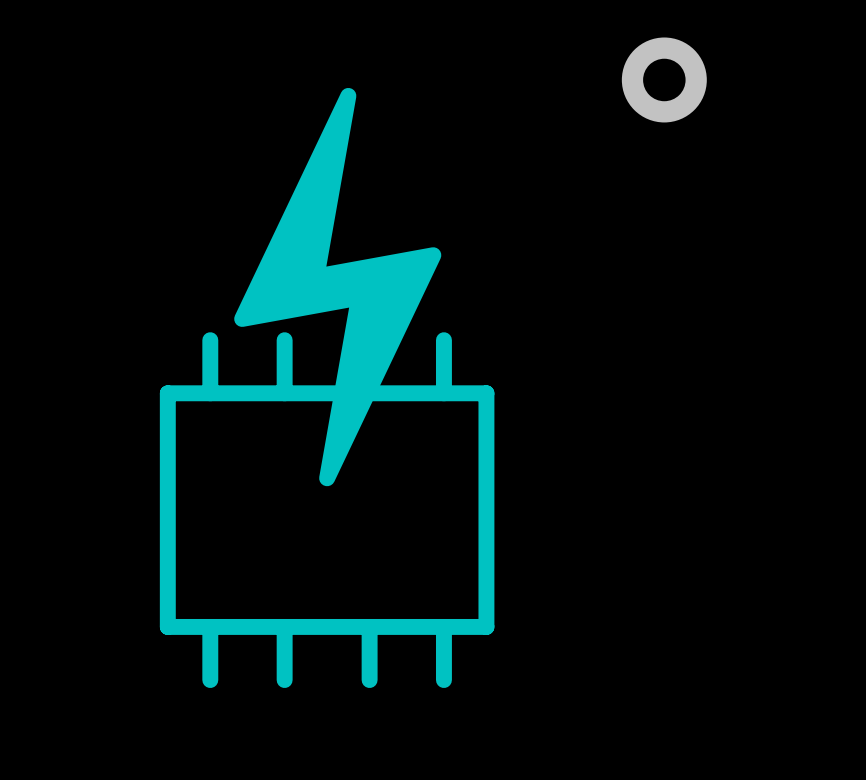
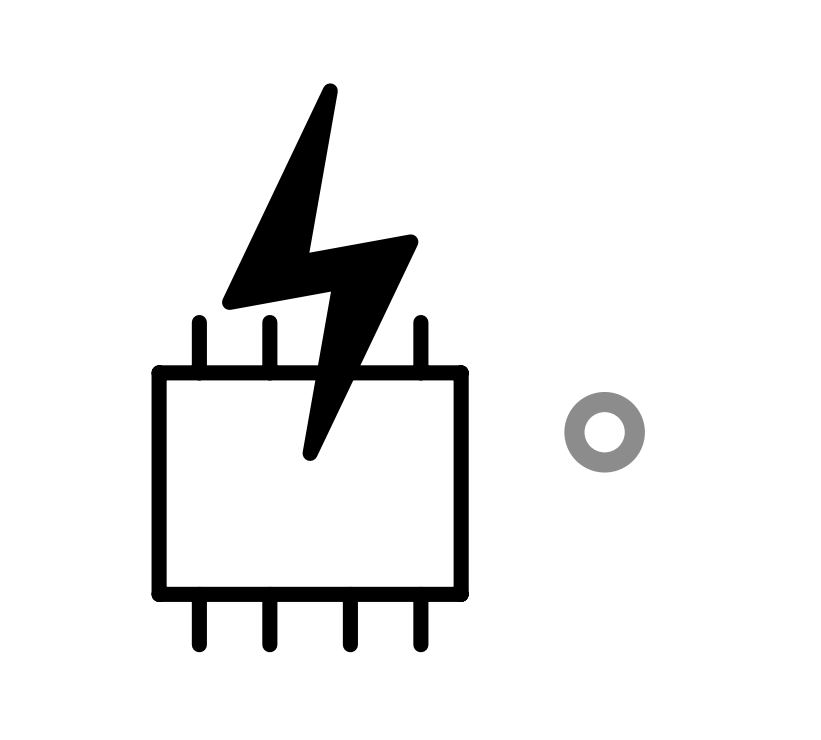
via: (664, 79) -> none
via: none -> (604, 432)

